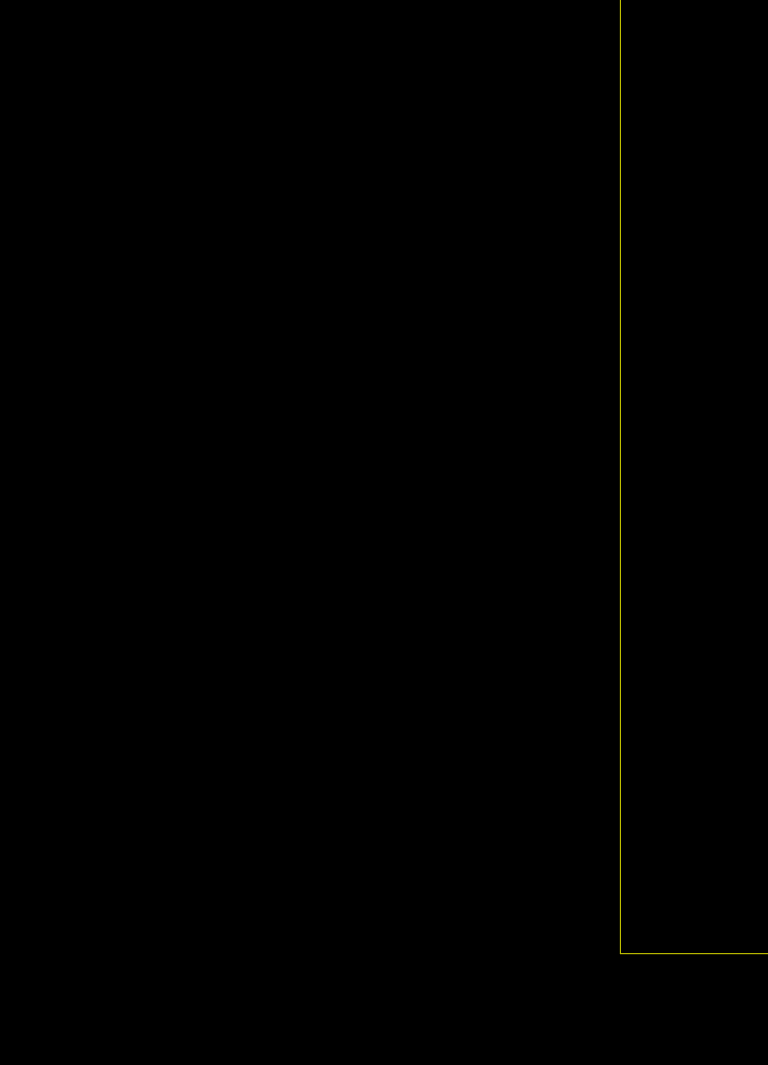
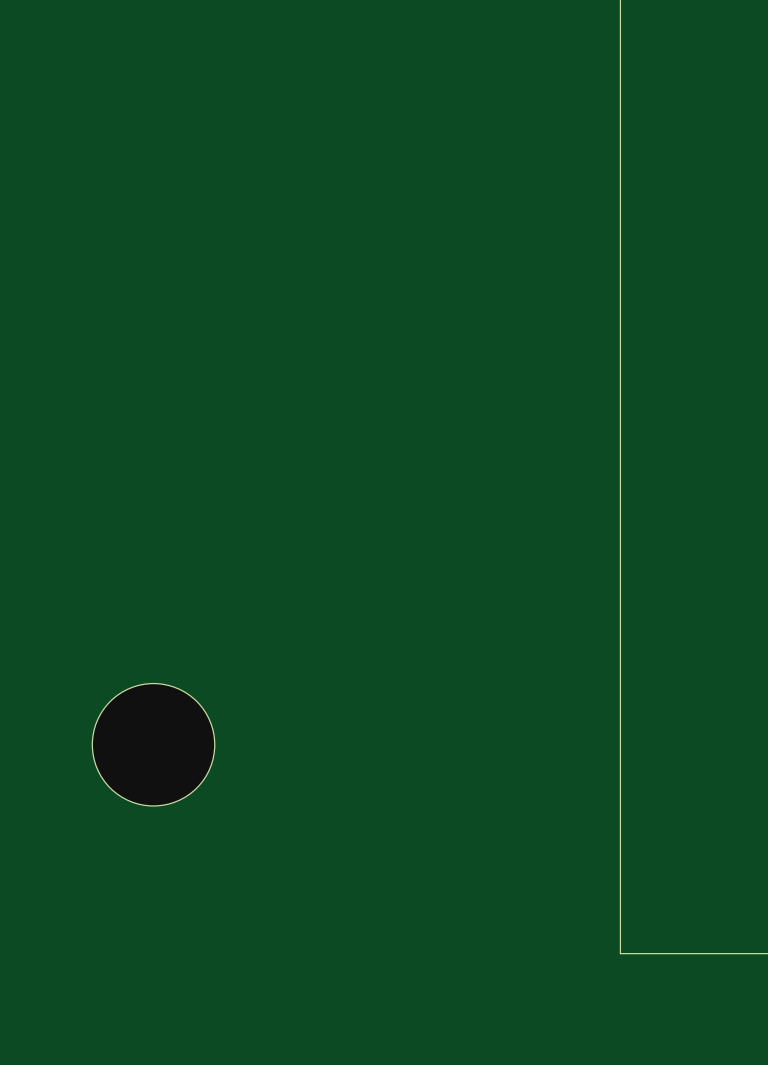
hole: none -> (153, 744)

